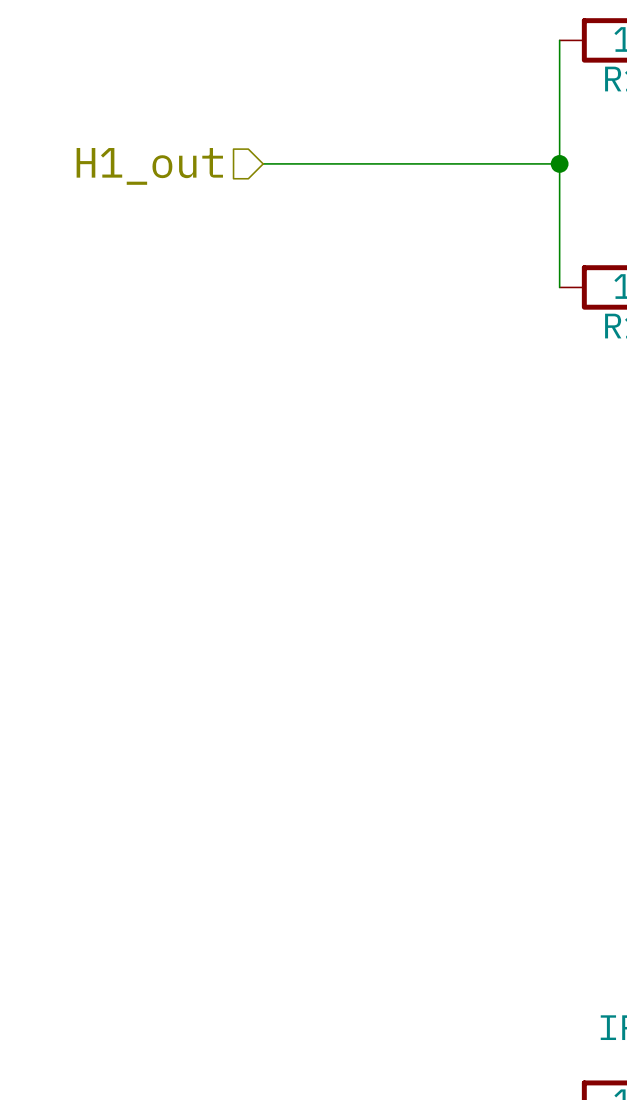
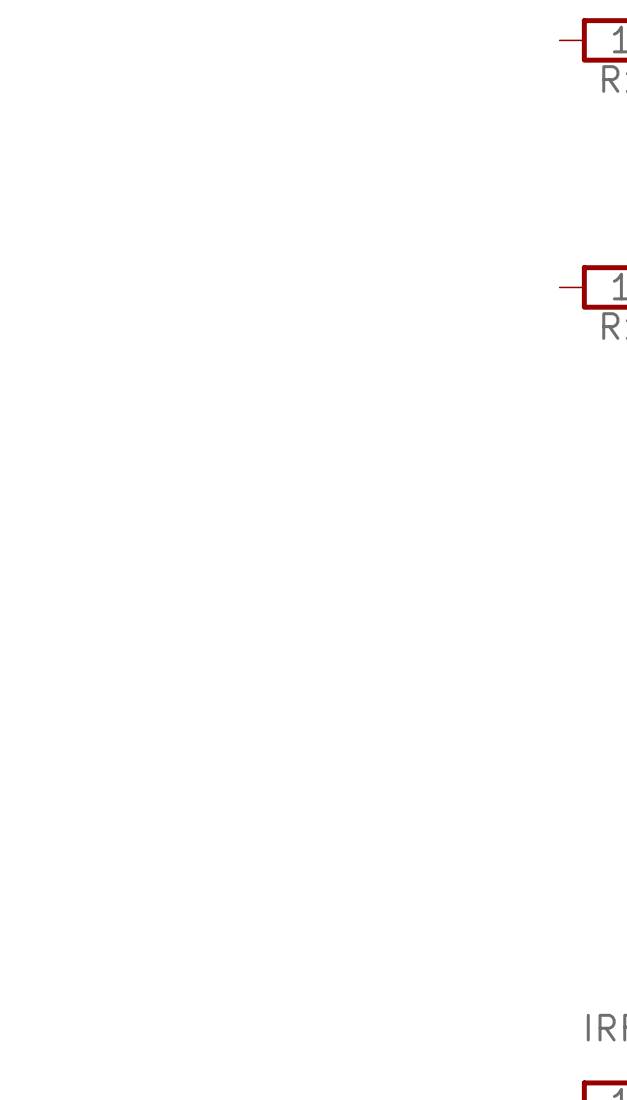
wire: (559, 40) (559, 287) -> none
wire: (263, 163) (559, 163) -> none
junction: (559, 163) -> none
hierarchical label: H1_out (149, 166) -> none

